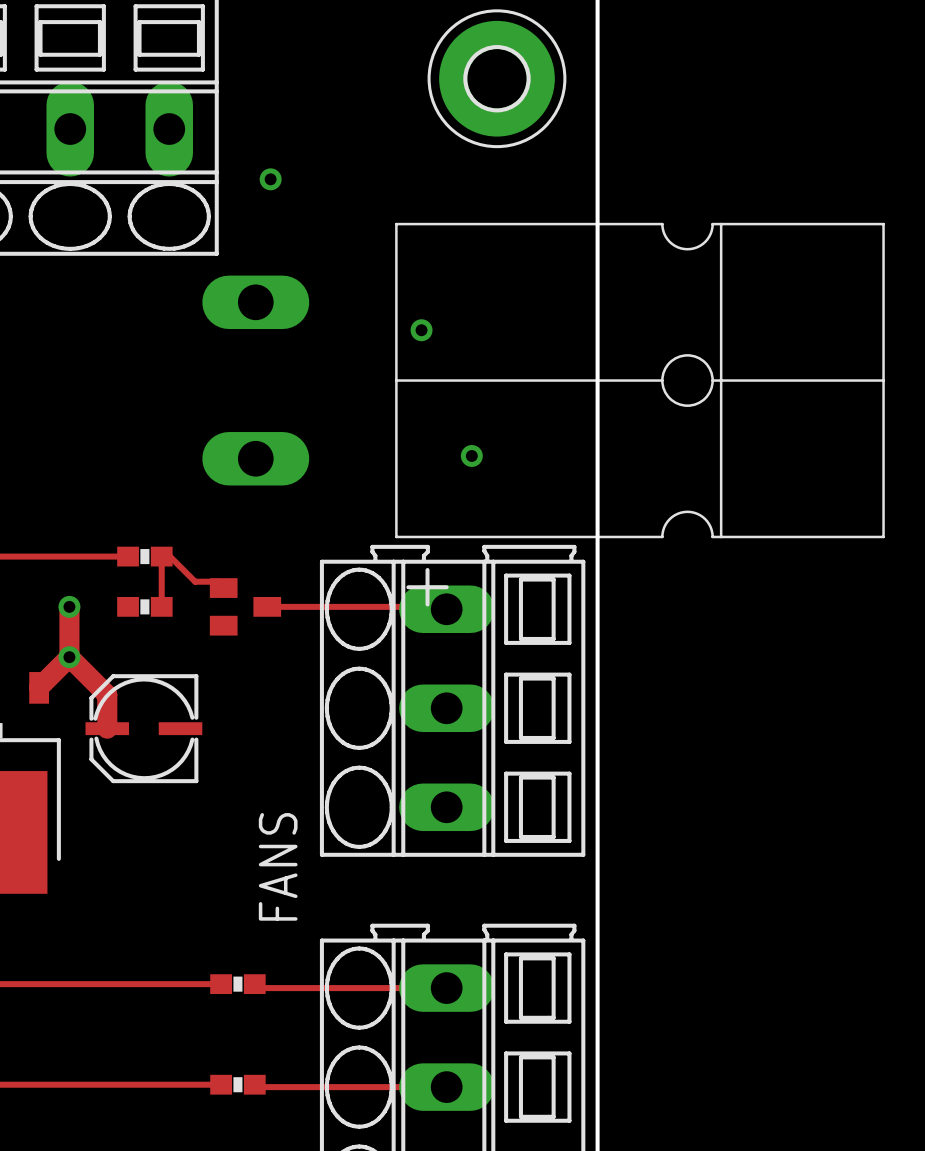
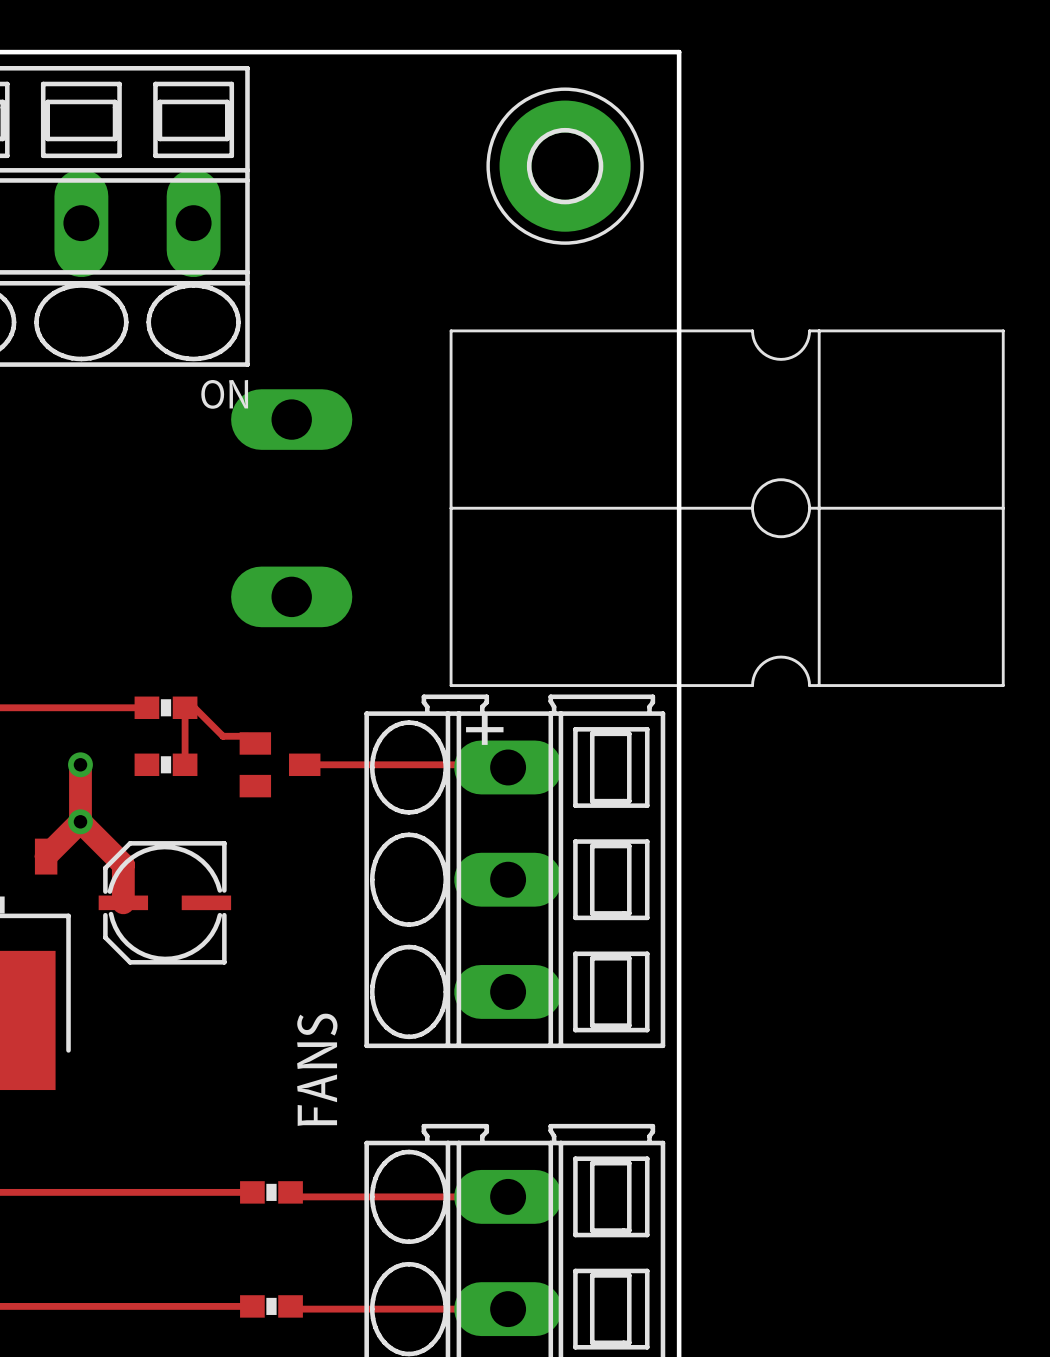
via: (270, 179) -> none
ON name: none -> ON (224, 394)
via: (421, 330) -> none
via: (471, 455) -> none

